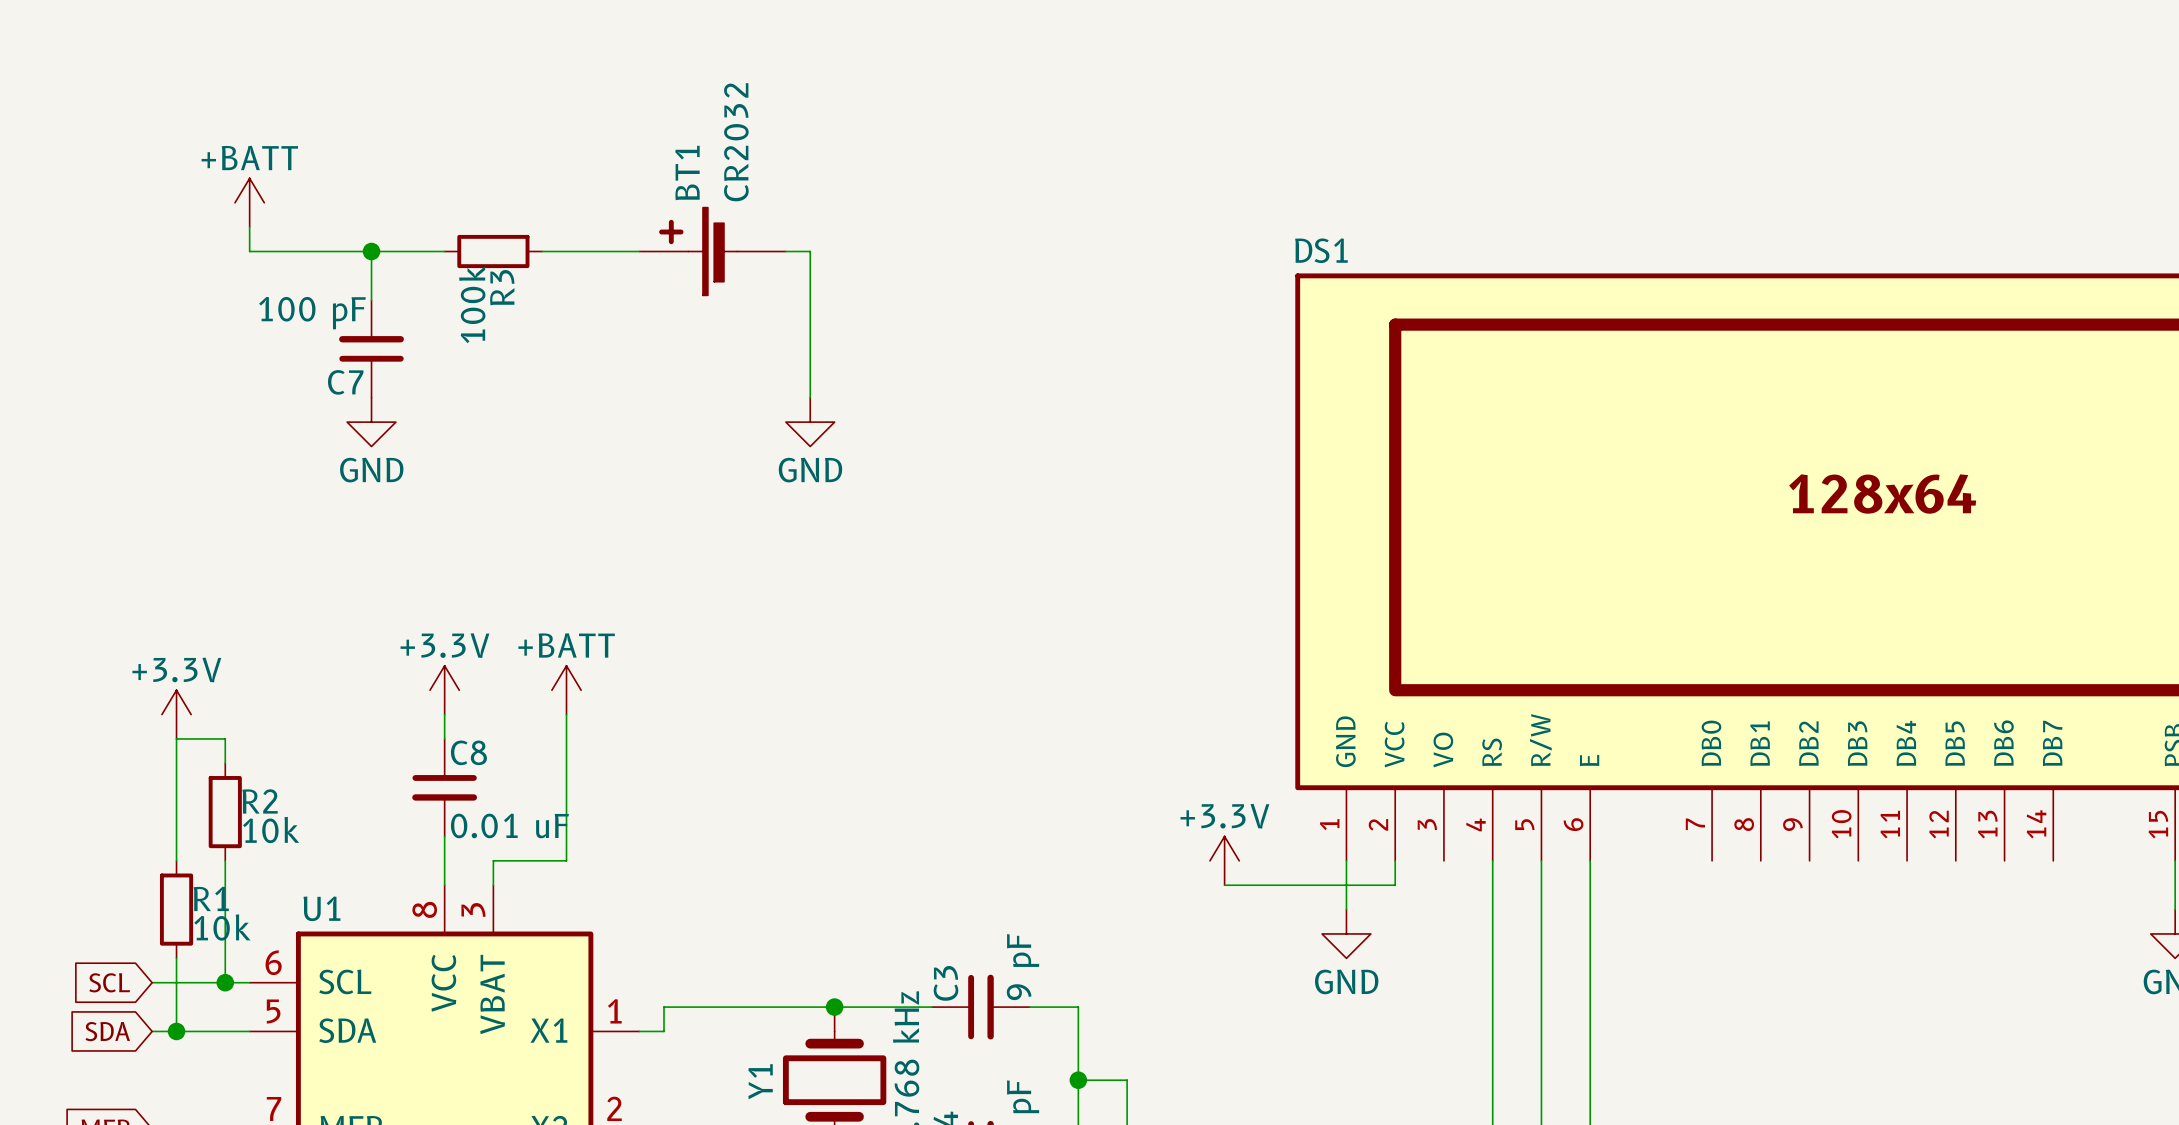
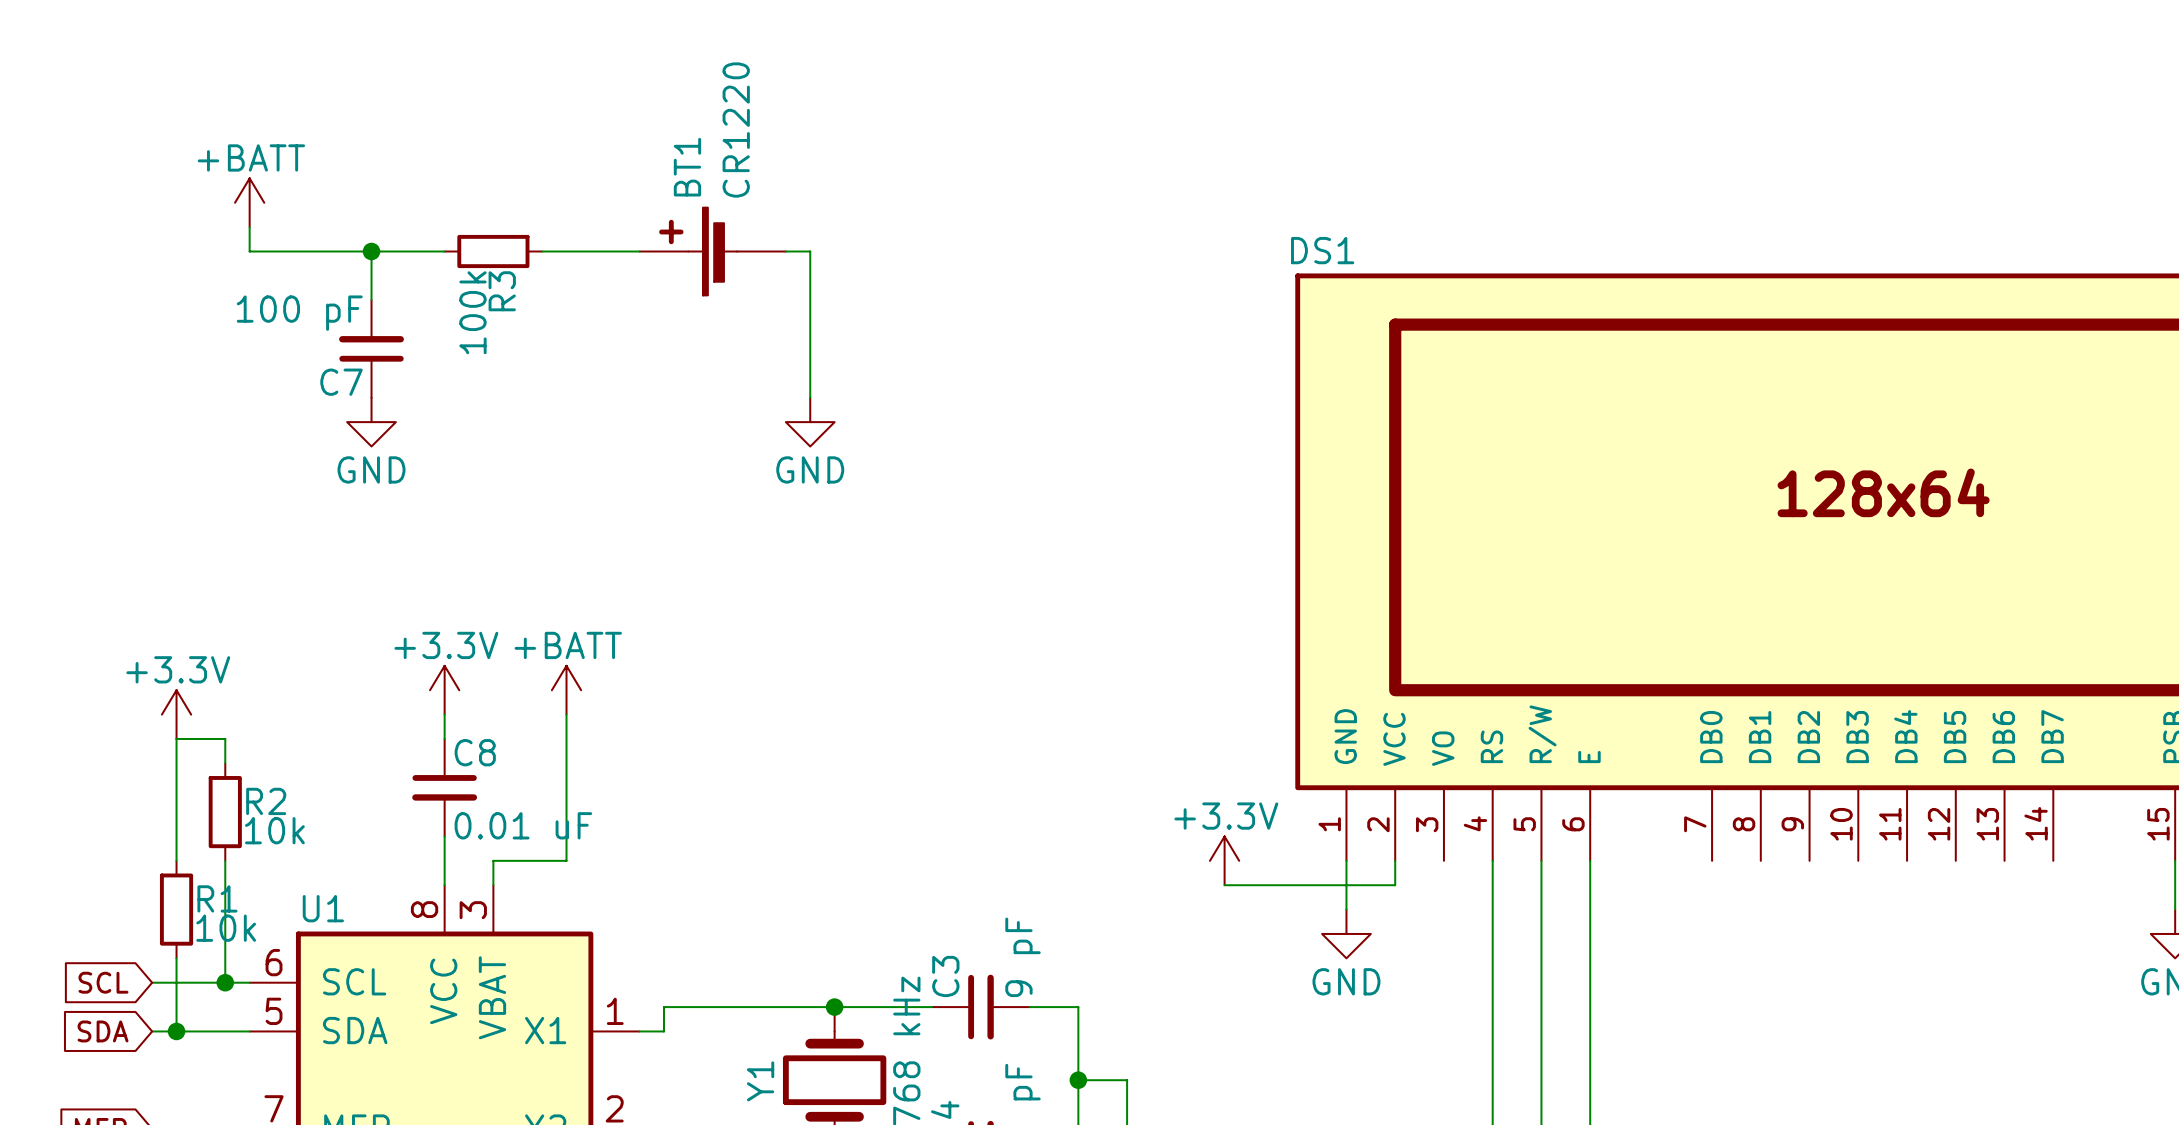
BT1 value: CR2032 (736, 142) -> CR1220 (736, 130)

